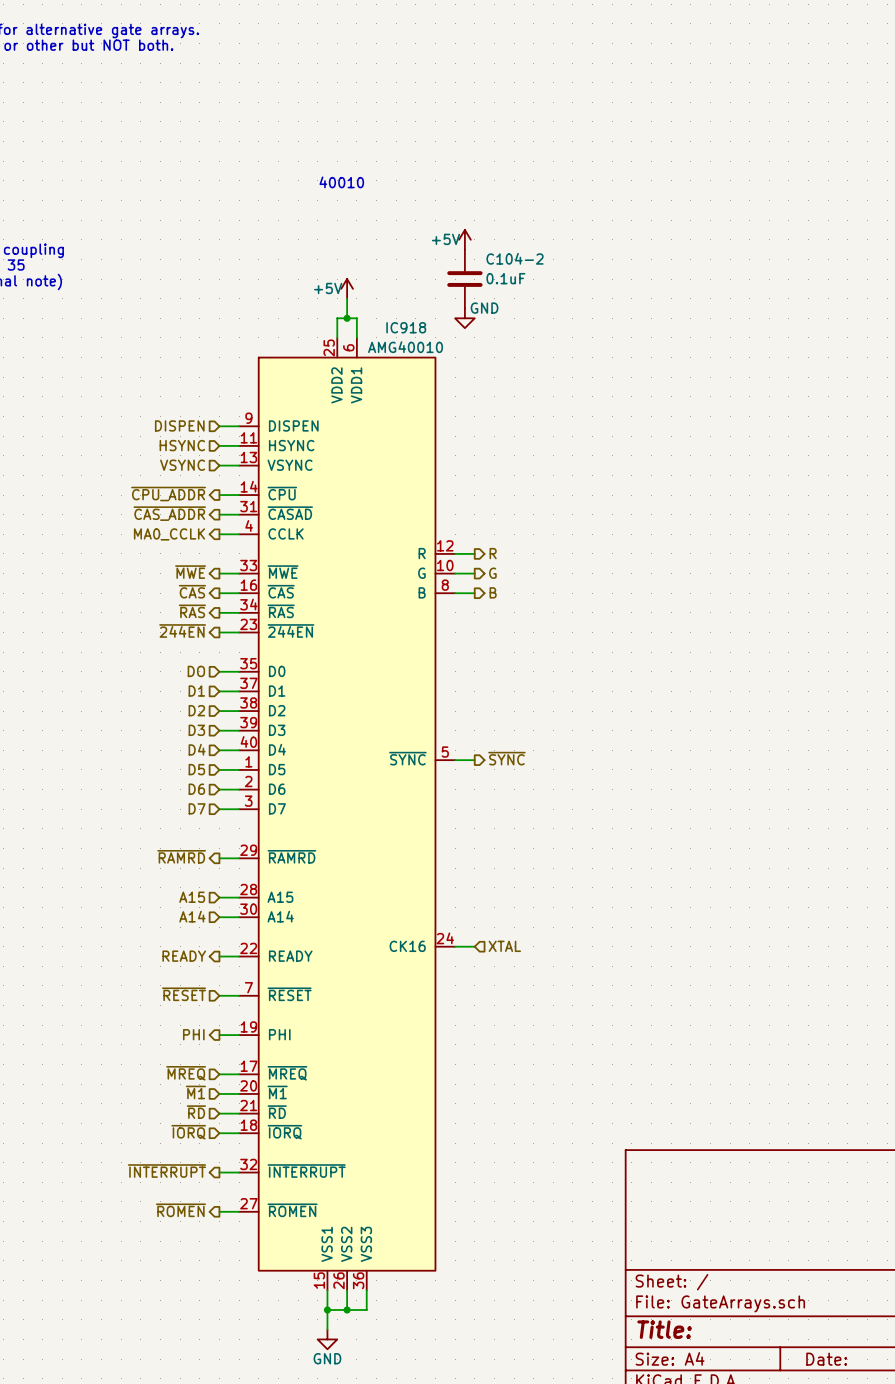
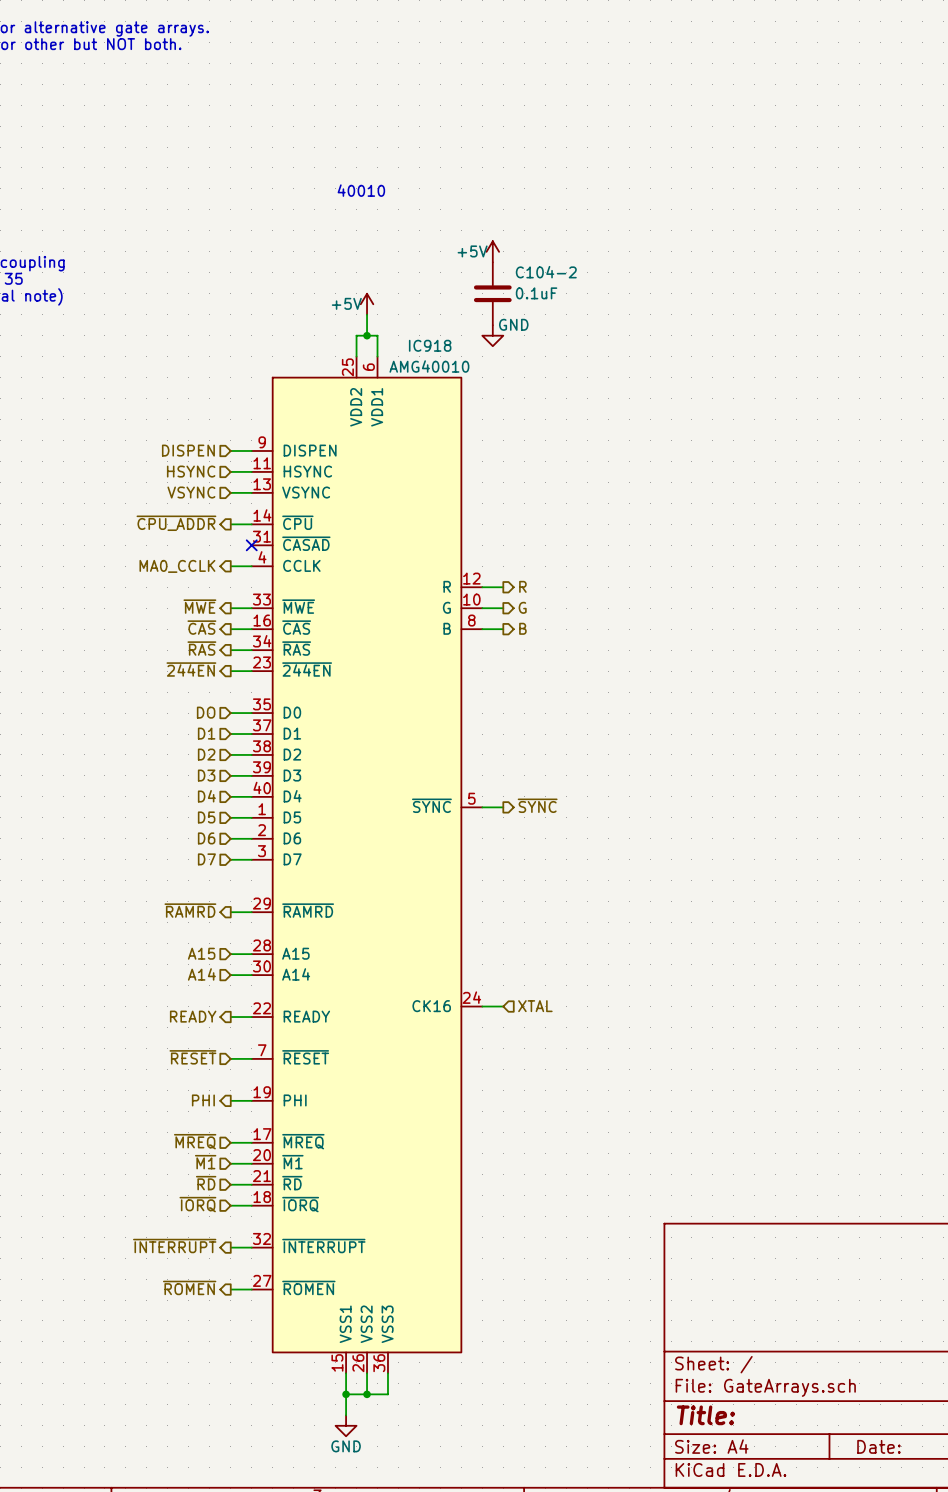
hierarchical label: ~{CAS_ADDR} (169, 513) -> none
wire: (219, 514) (239, 514) -> none
no-connect mark: none -> (251, 545)

